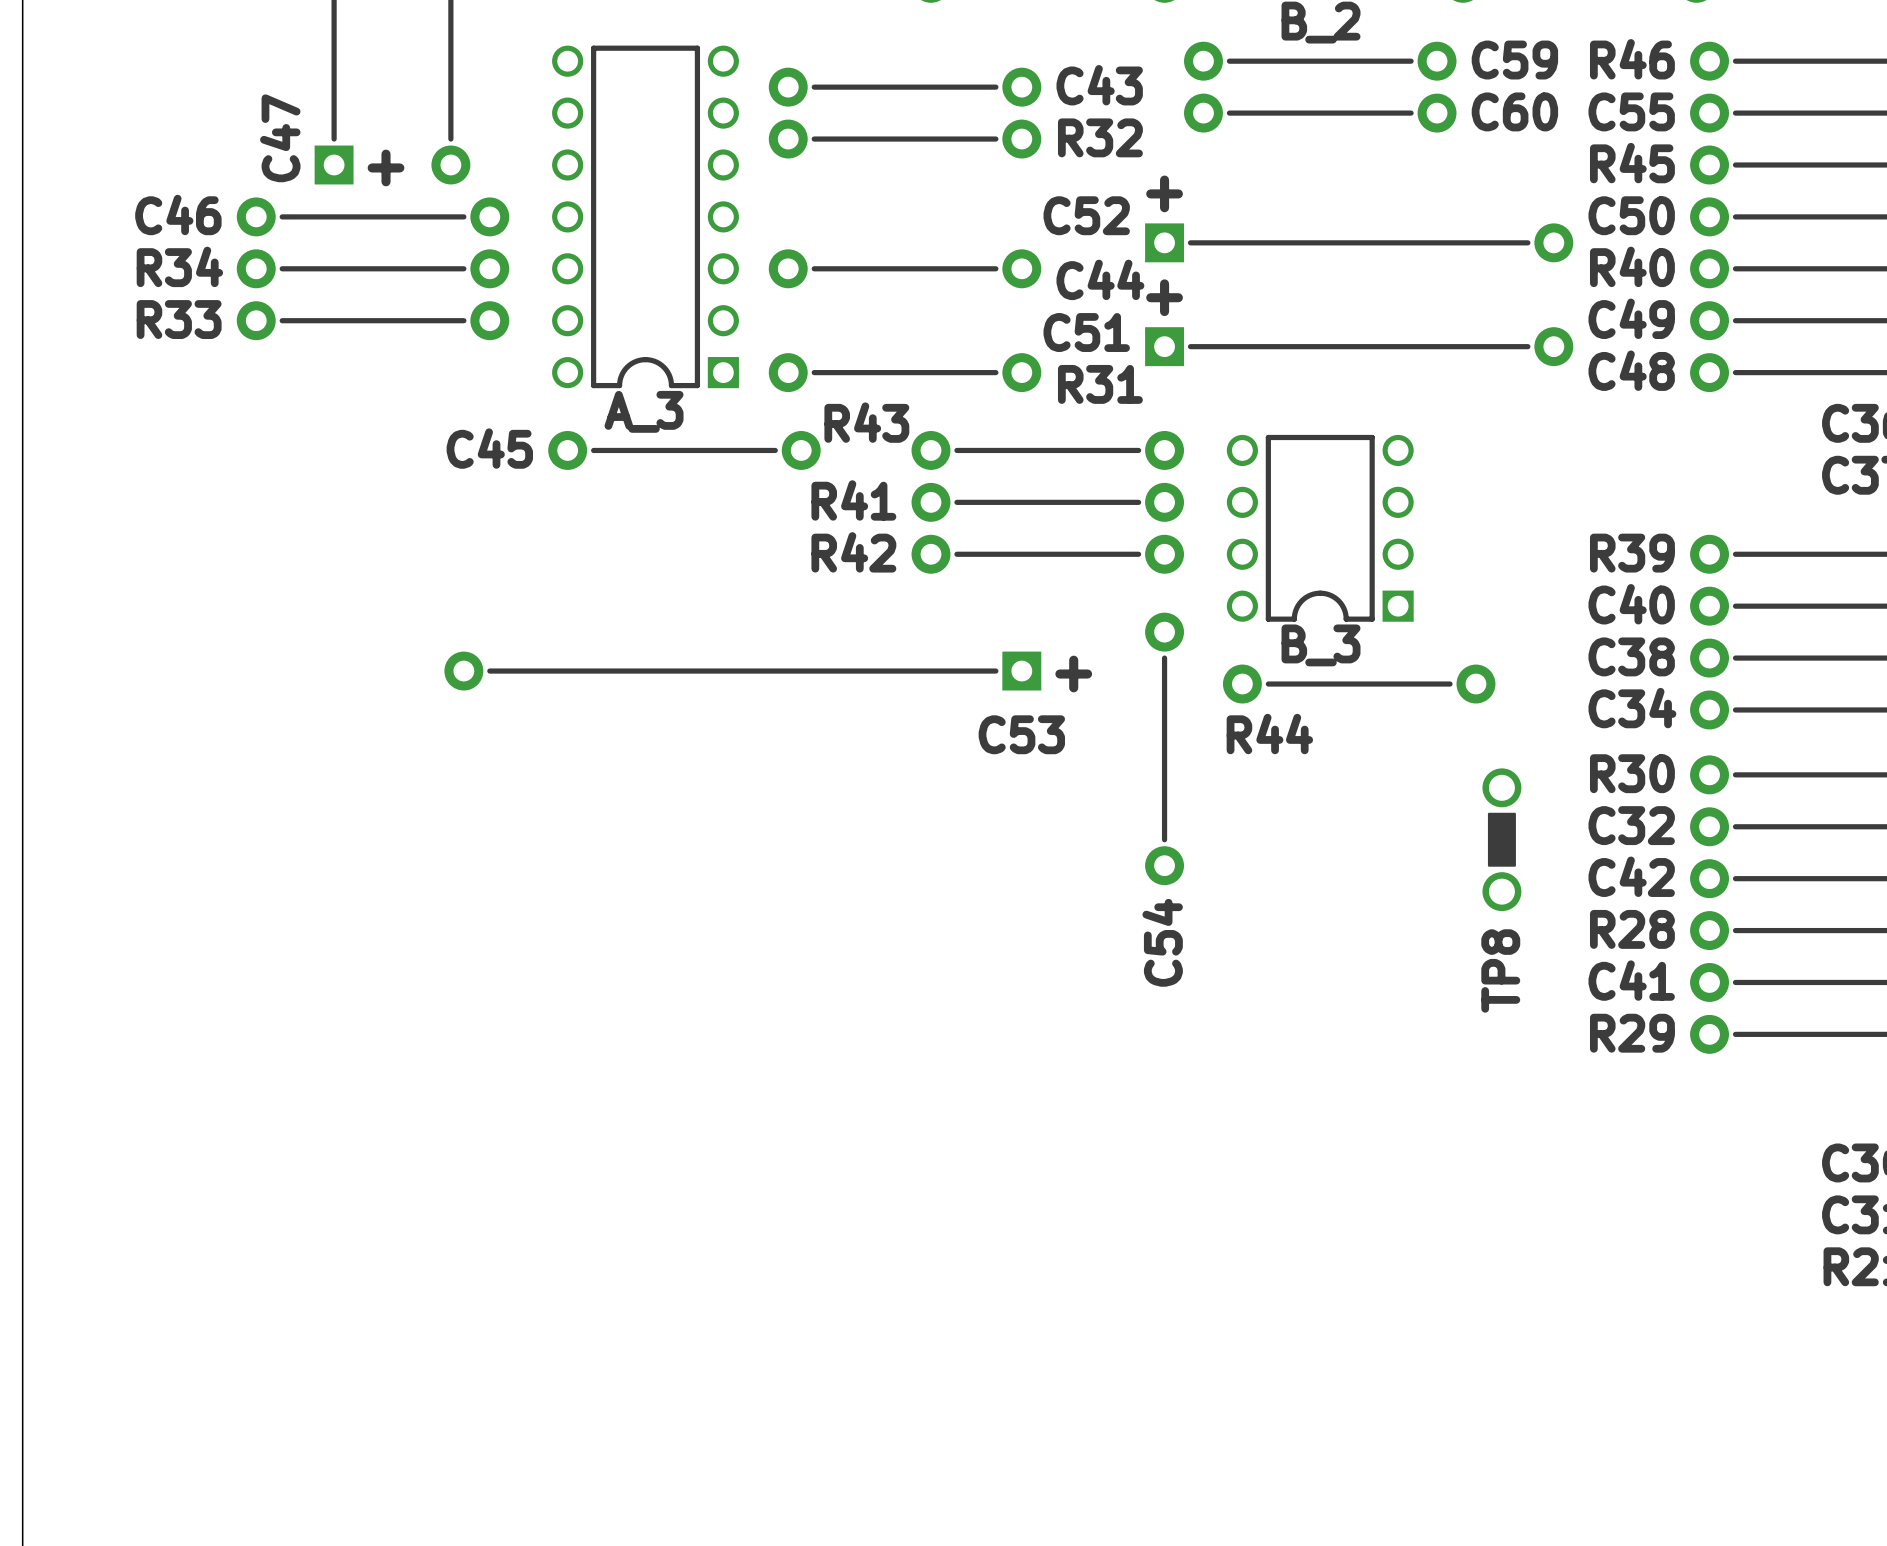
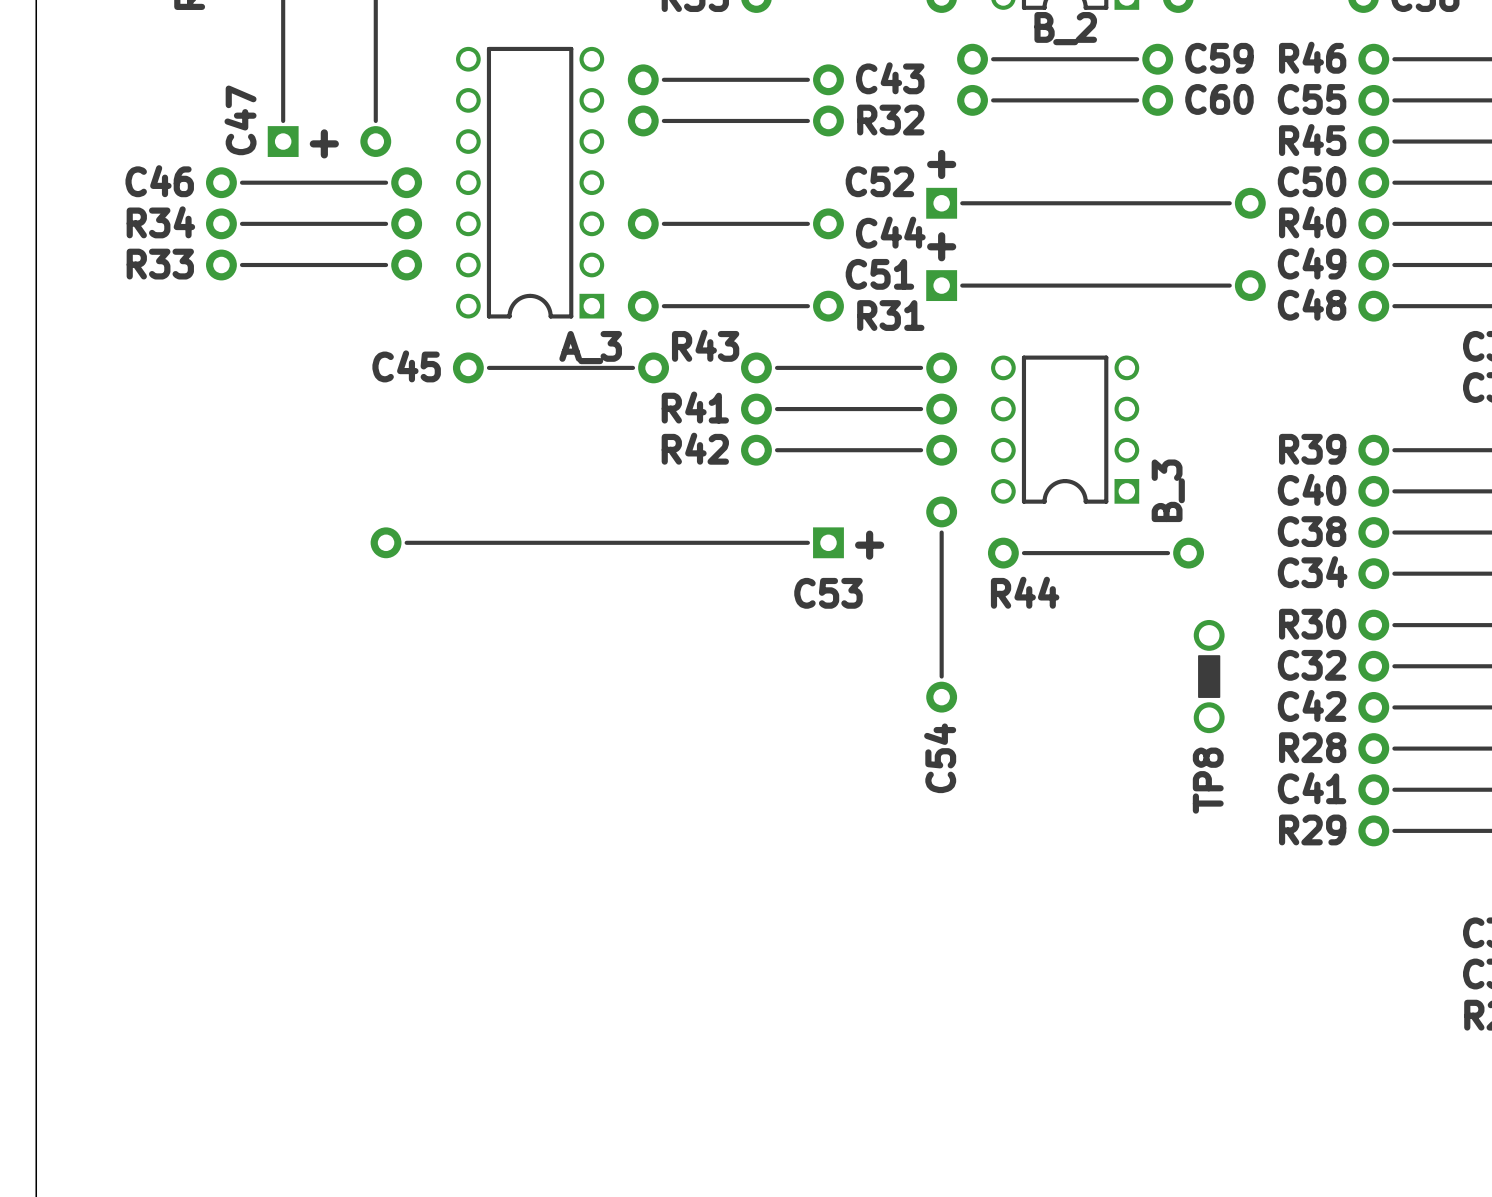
A_3 name position: A_3 (644, 411) -> A_3 (590, 347)
B_3 name rotation: 0° (1321, 645) -> 90° counterclockwise (1168, 490)
B_3 name position: B_3 (1321, 645) -> B_3 (1168, 490)

